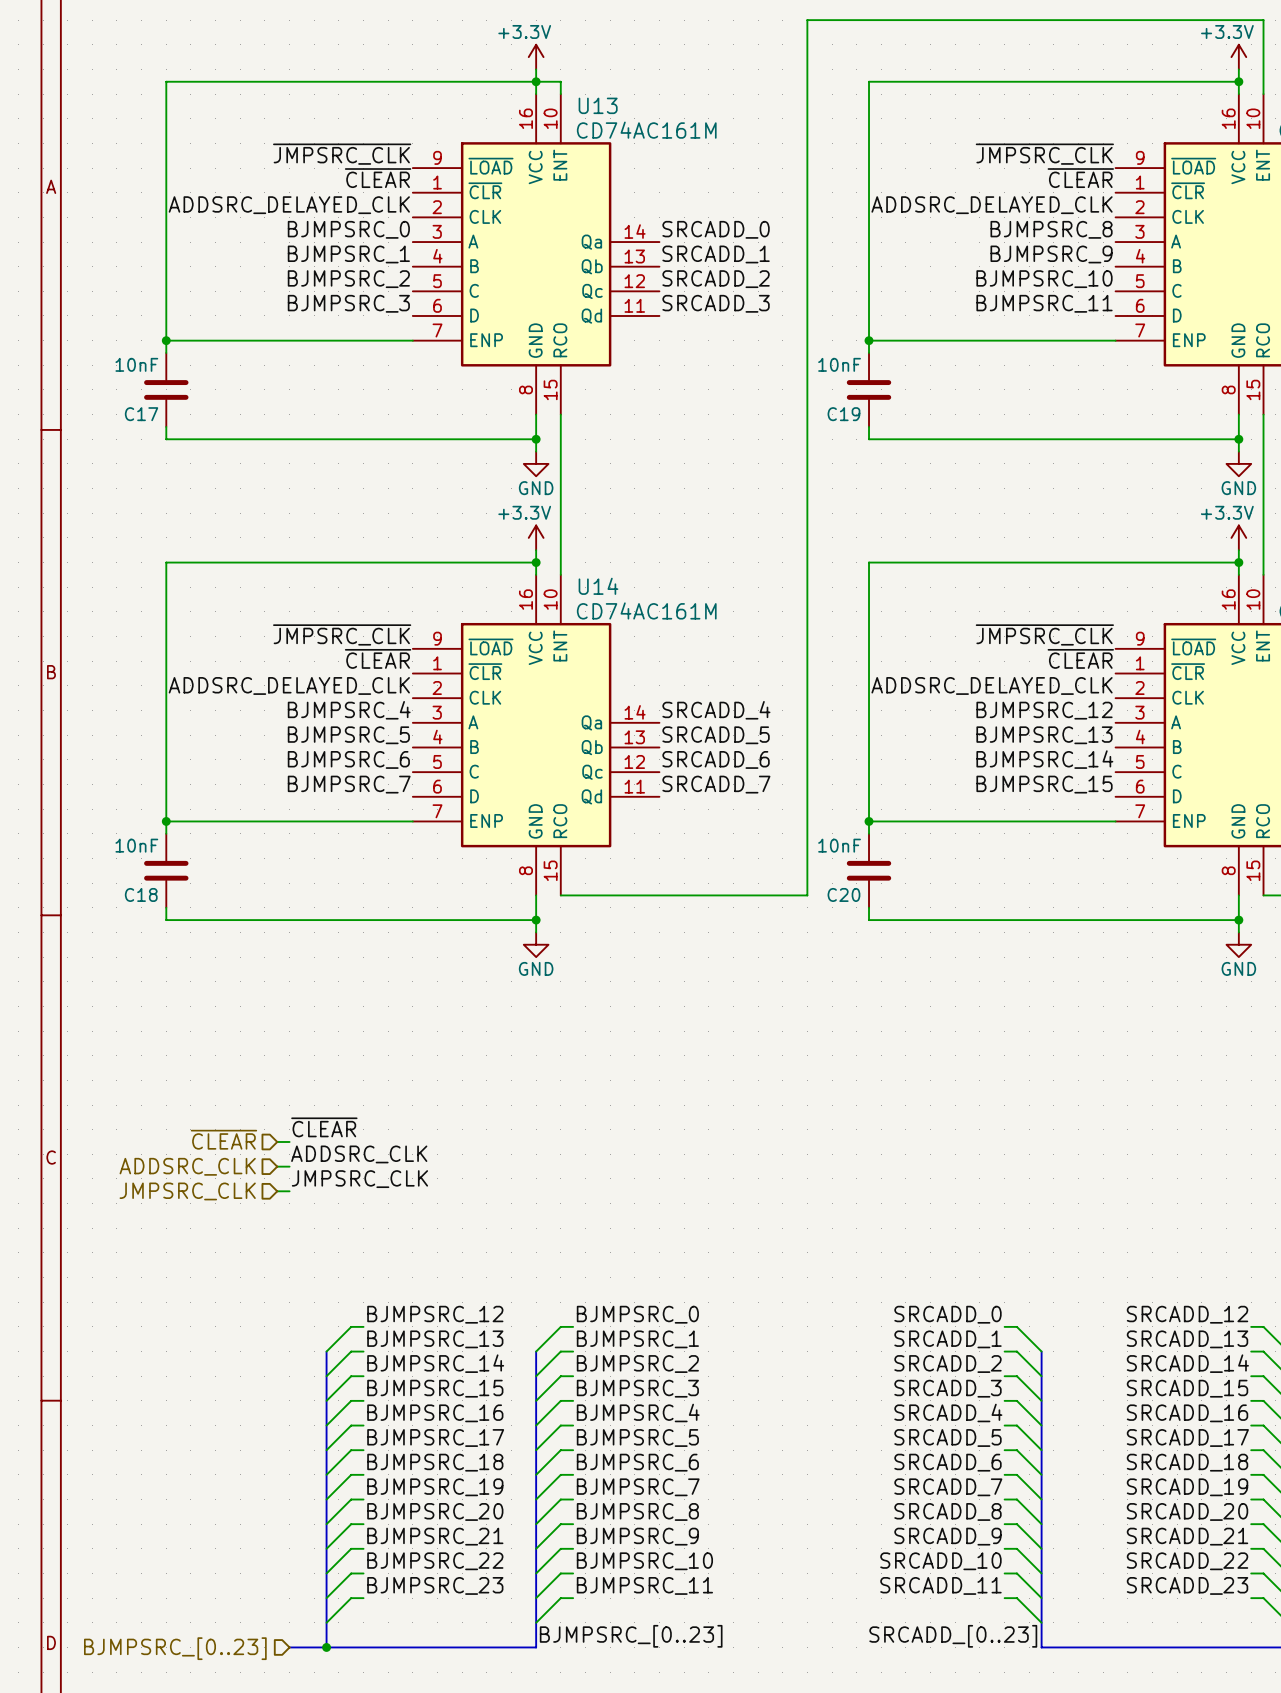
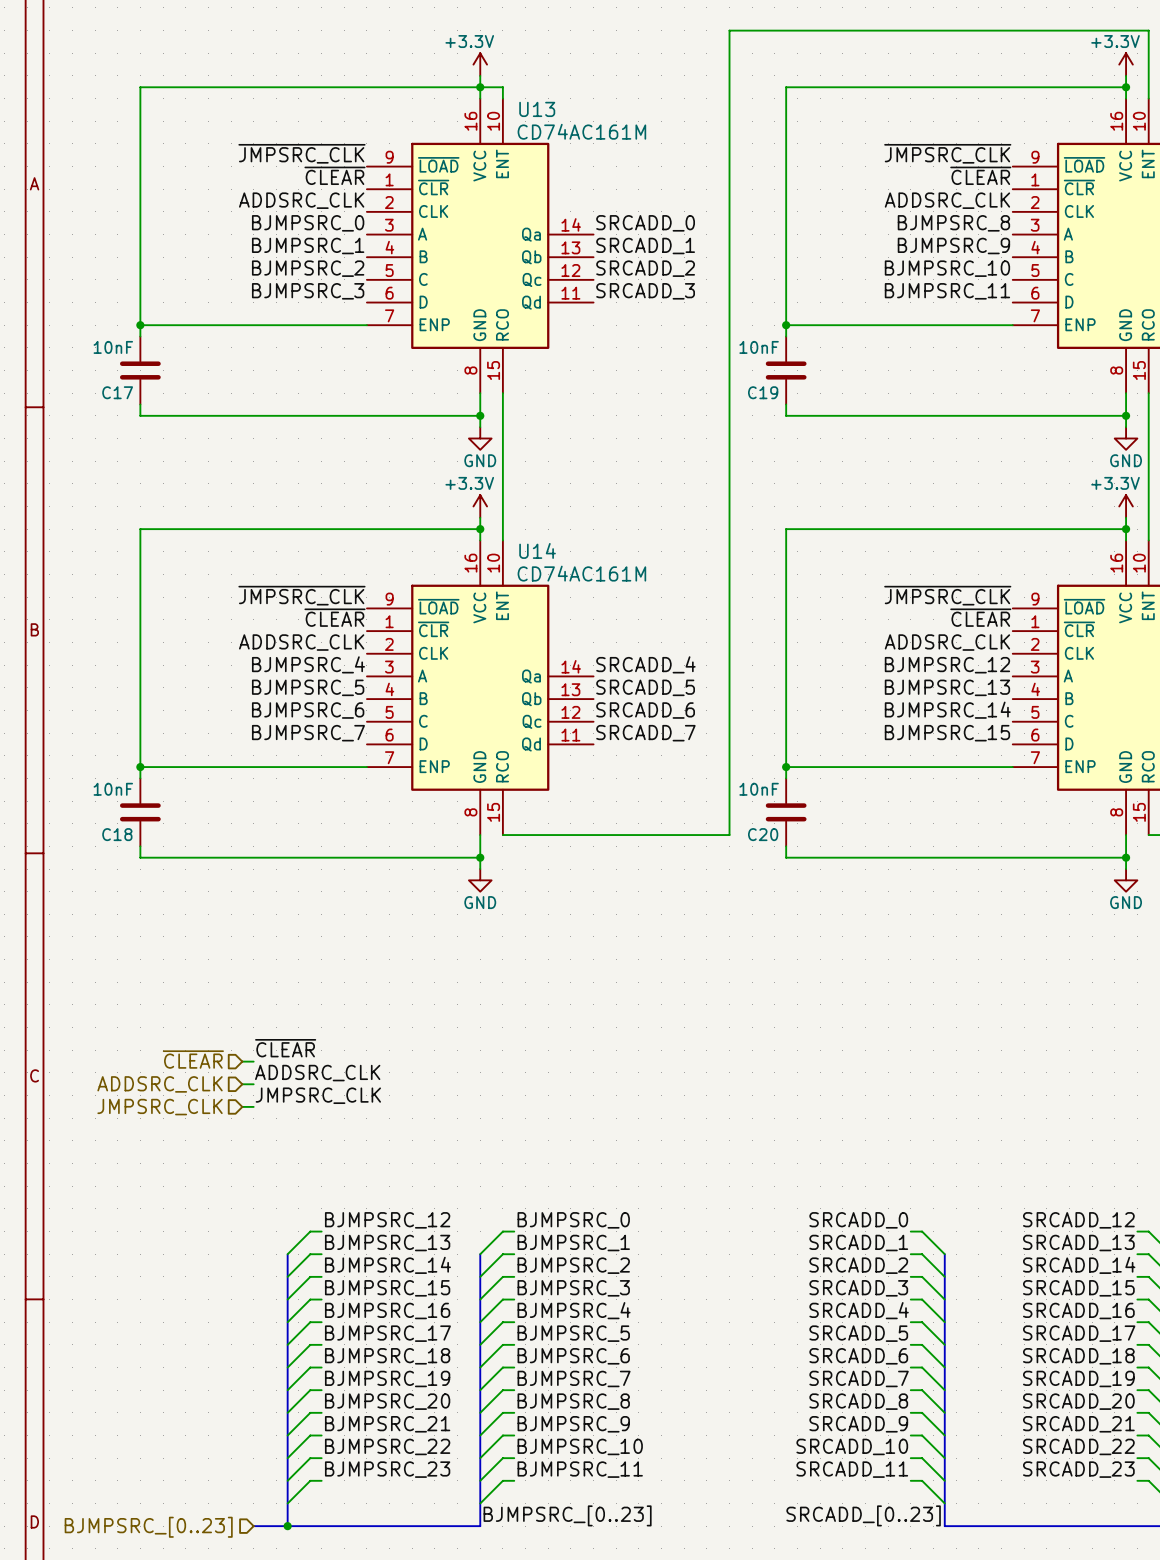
label: ADDSRC_DELAYED_CLK (289, 205) -> ADDSRC_CLK (301, 200)
label: ADDSRC_DELAYED_CLK (992, 205) -> ADDSRC_CLK (947, 200)
label: ADDSRC_DELAYED_CLK (289, 685) -> ADDSRC_CLK (301, 642)
label: ADDSRC_DELAYED_CLK (992, 685) -> ADDSRC_CLK (947, 642)

